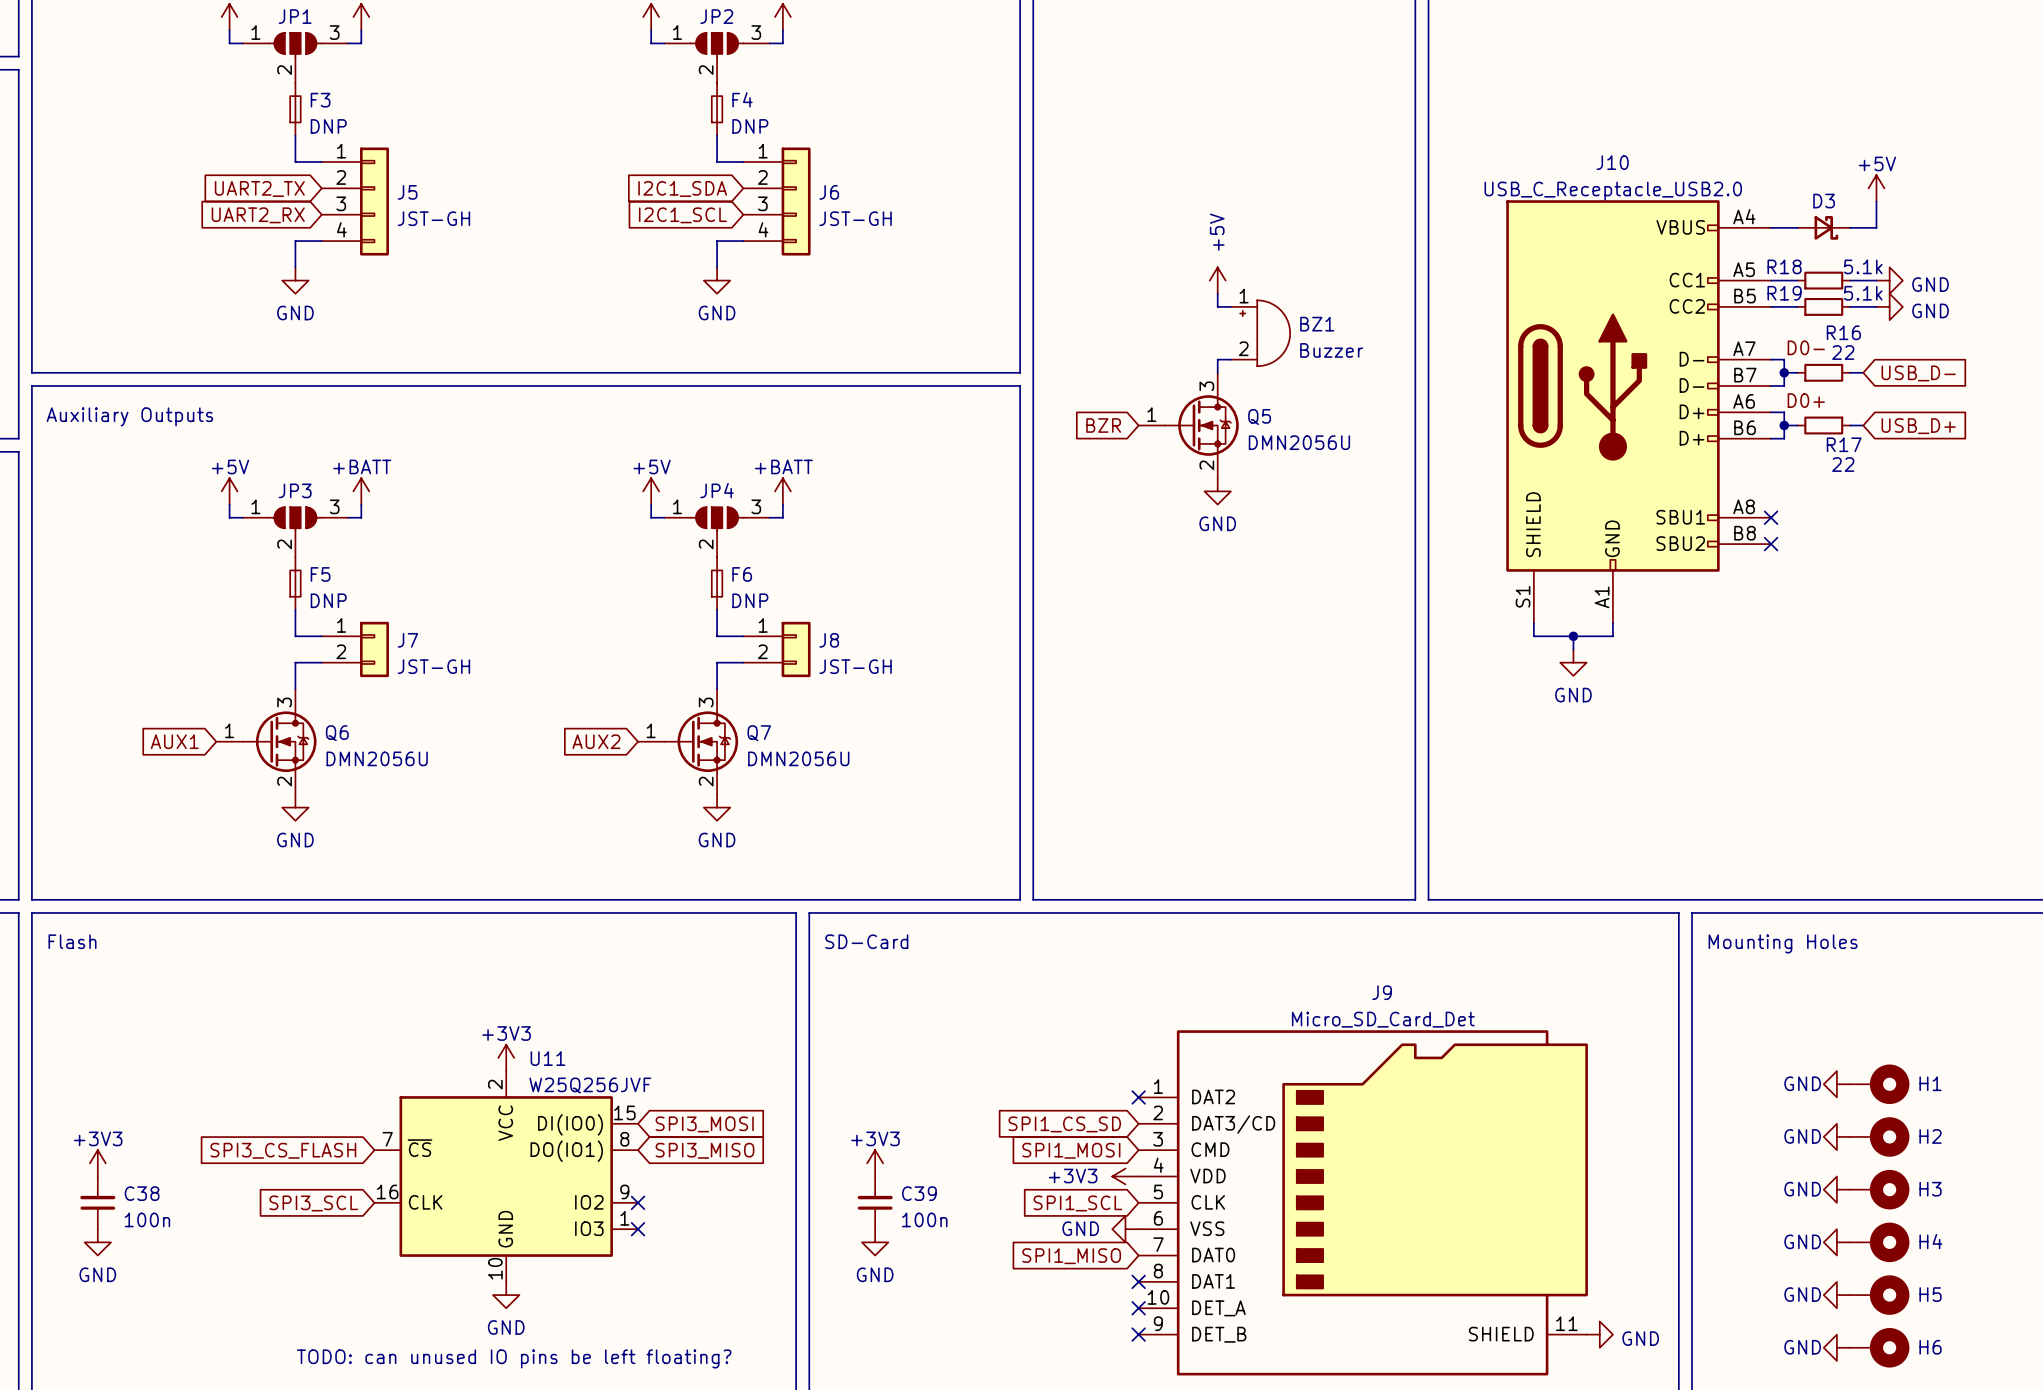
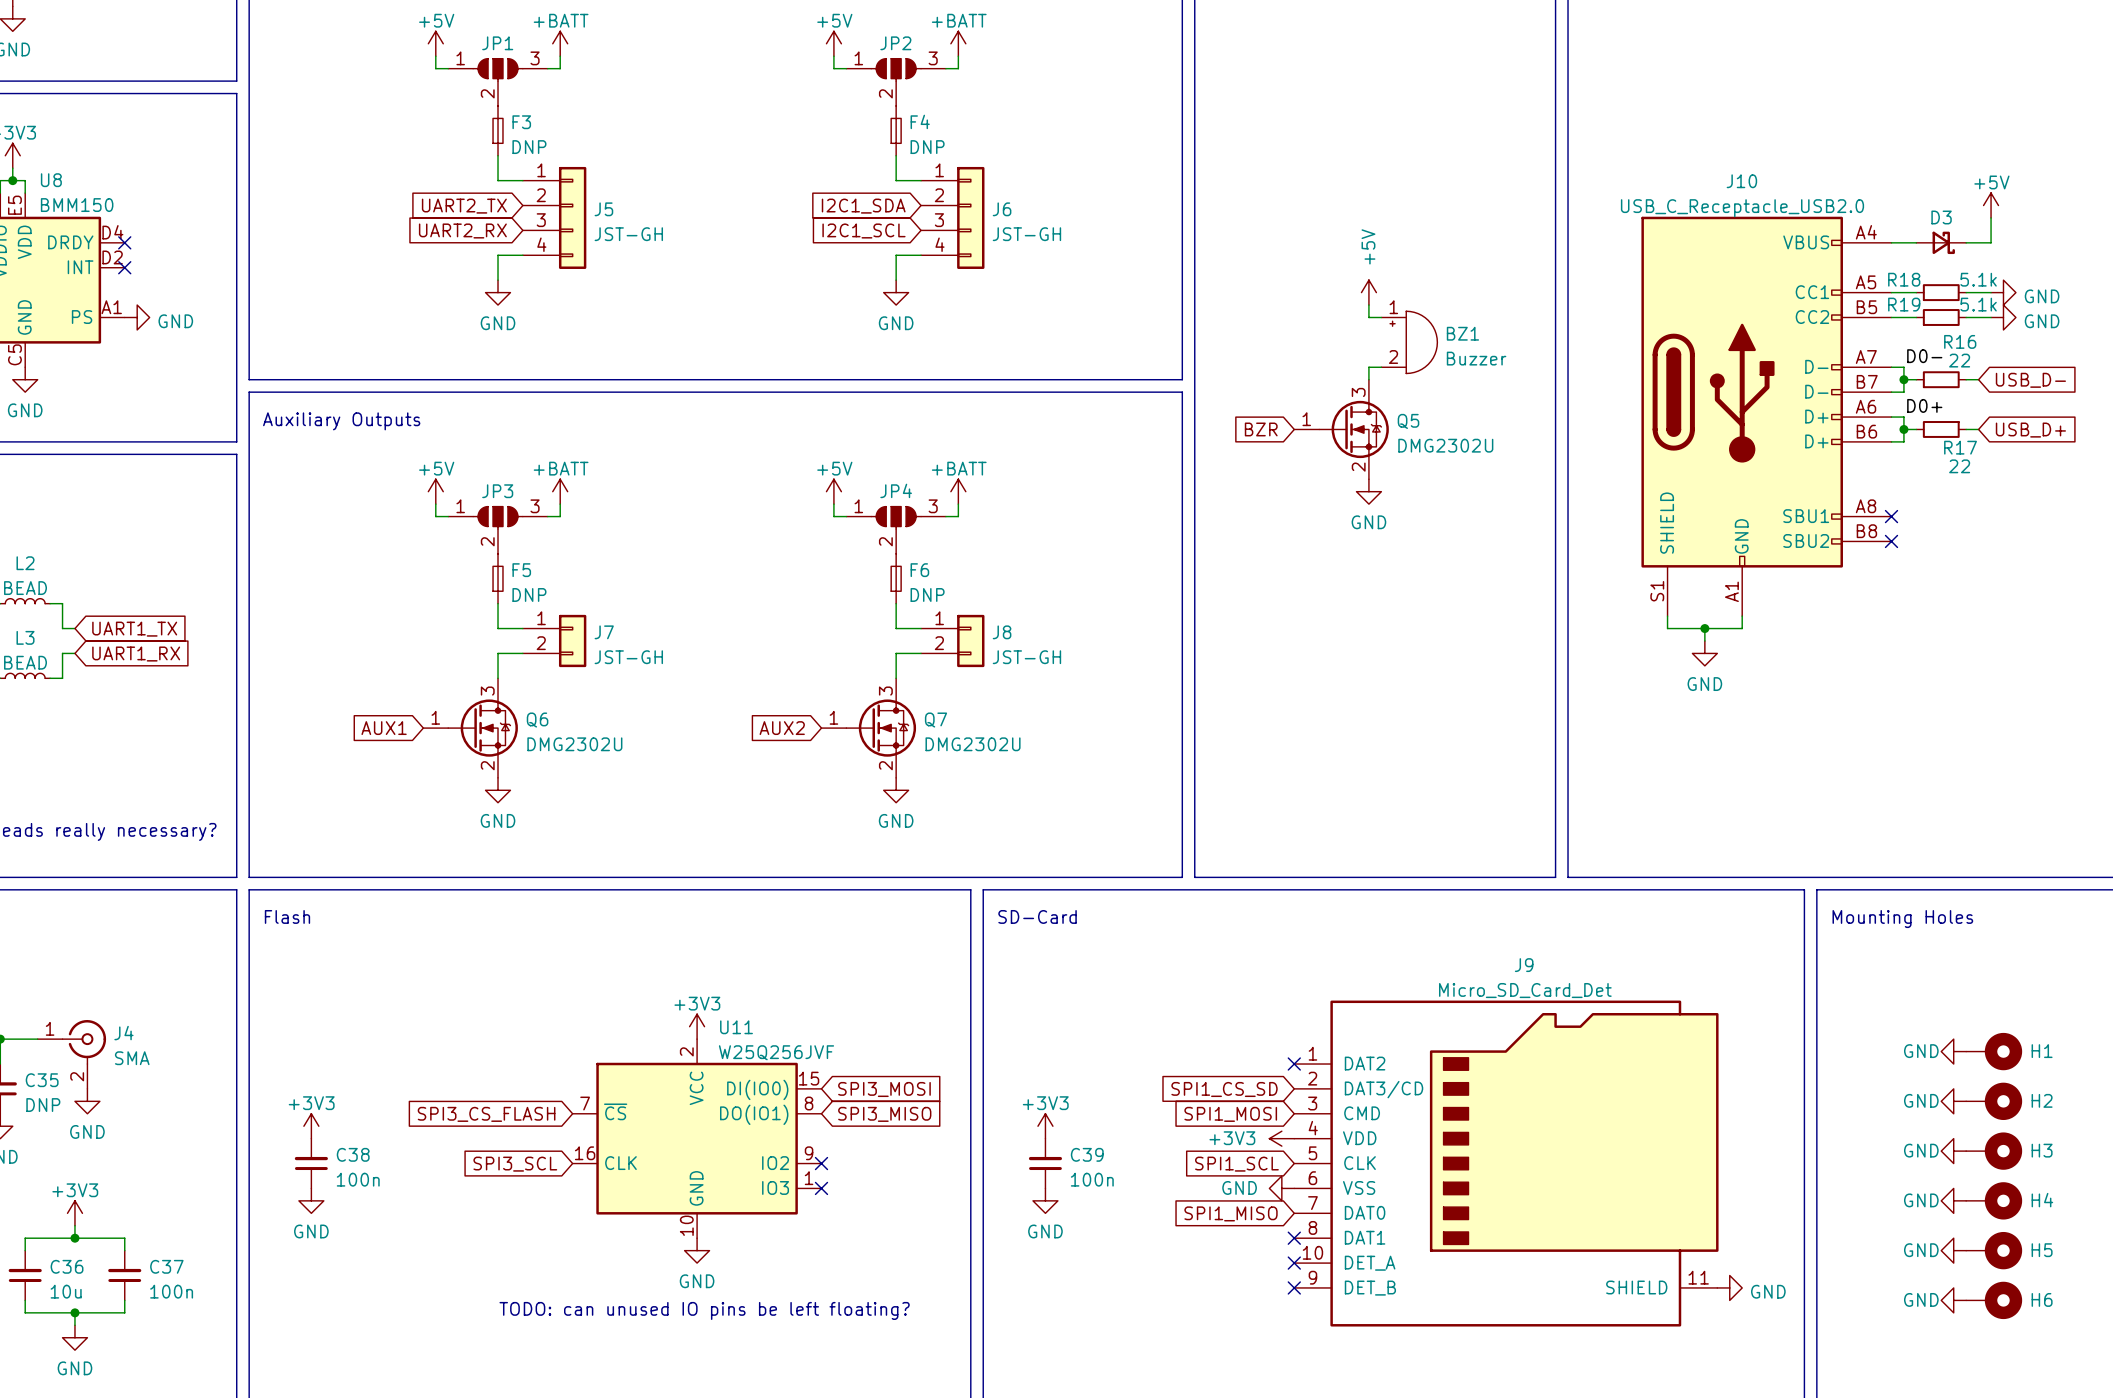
Q5 value: DMN2056U (1299, 442) -> DMG2302U (1445, 445)
Q6 value: DMN2056U (377, 758) -> DMG2302U (574, 744)
Q7 value: DMN2056U (798, 758) -> DMG2302U (973, 744)

